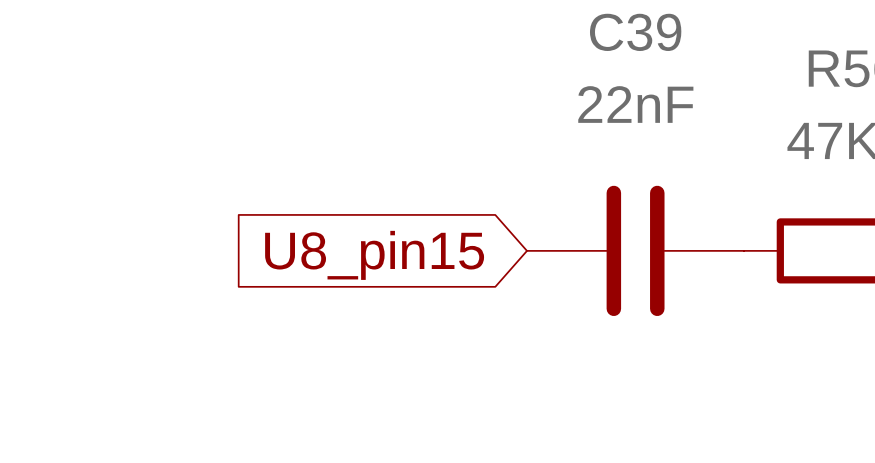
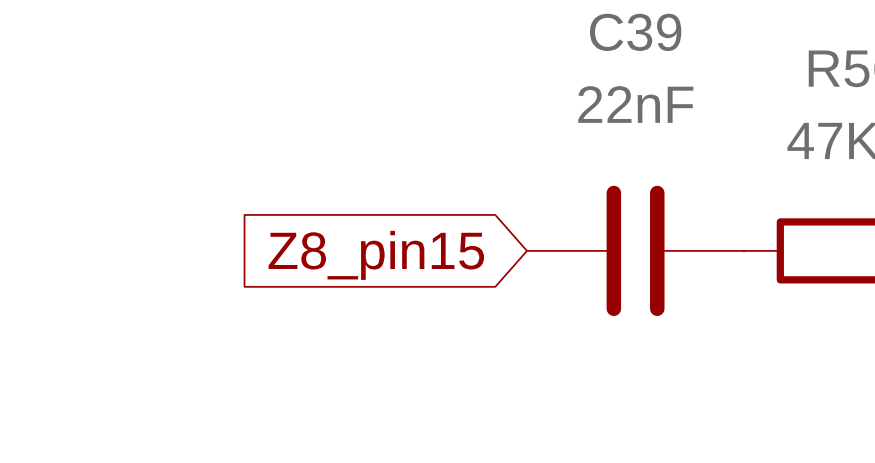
global label: U8_pin15 (374, 255) -> Z8_pin15 (376, 255)

